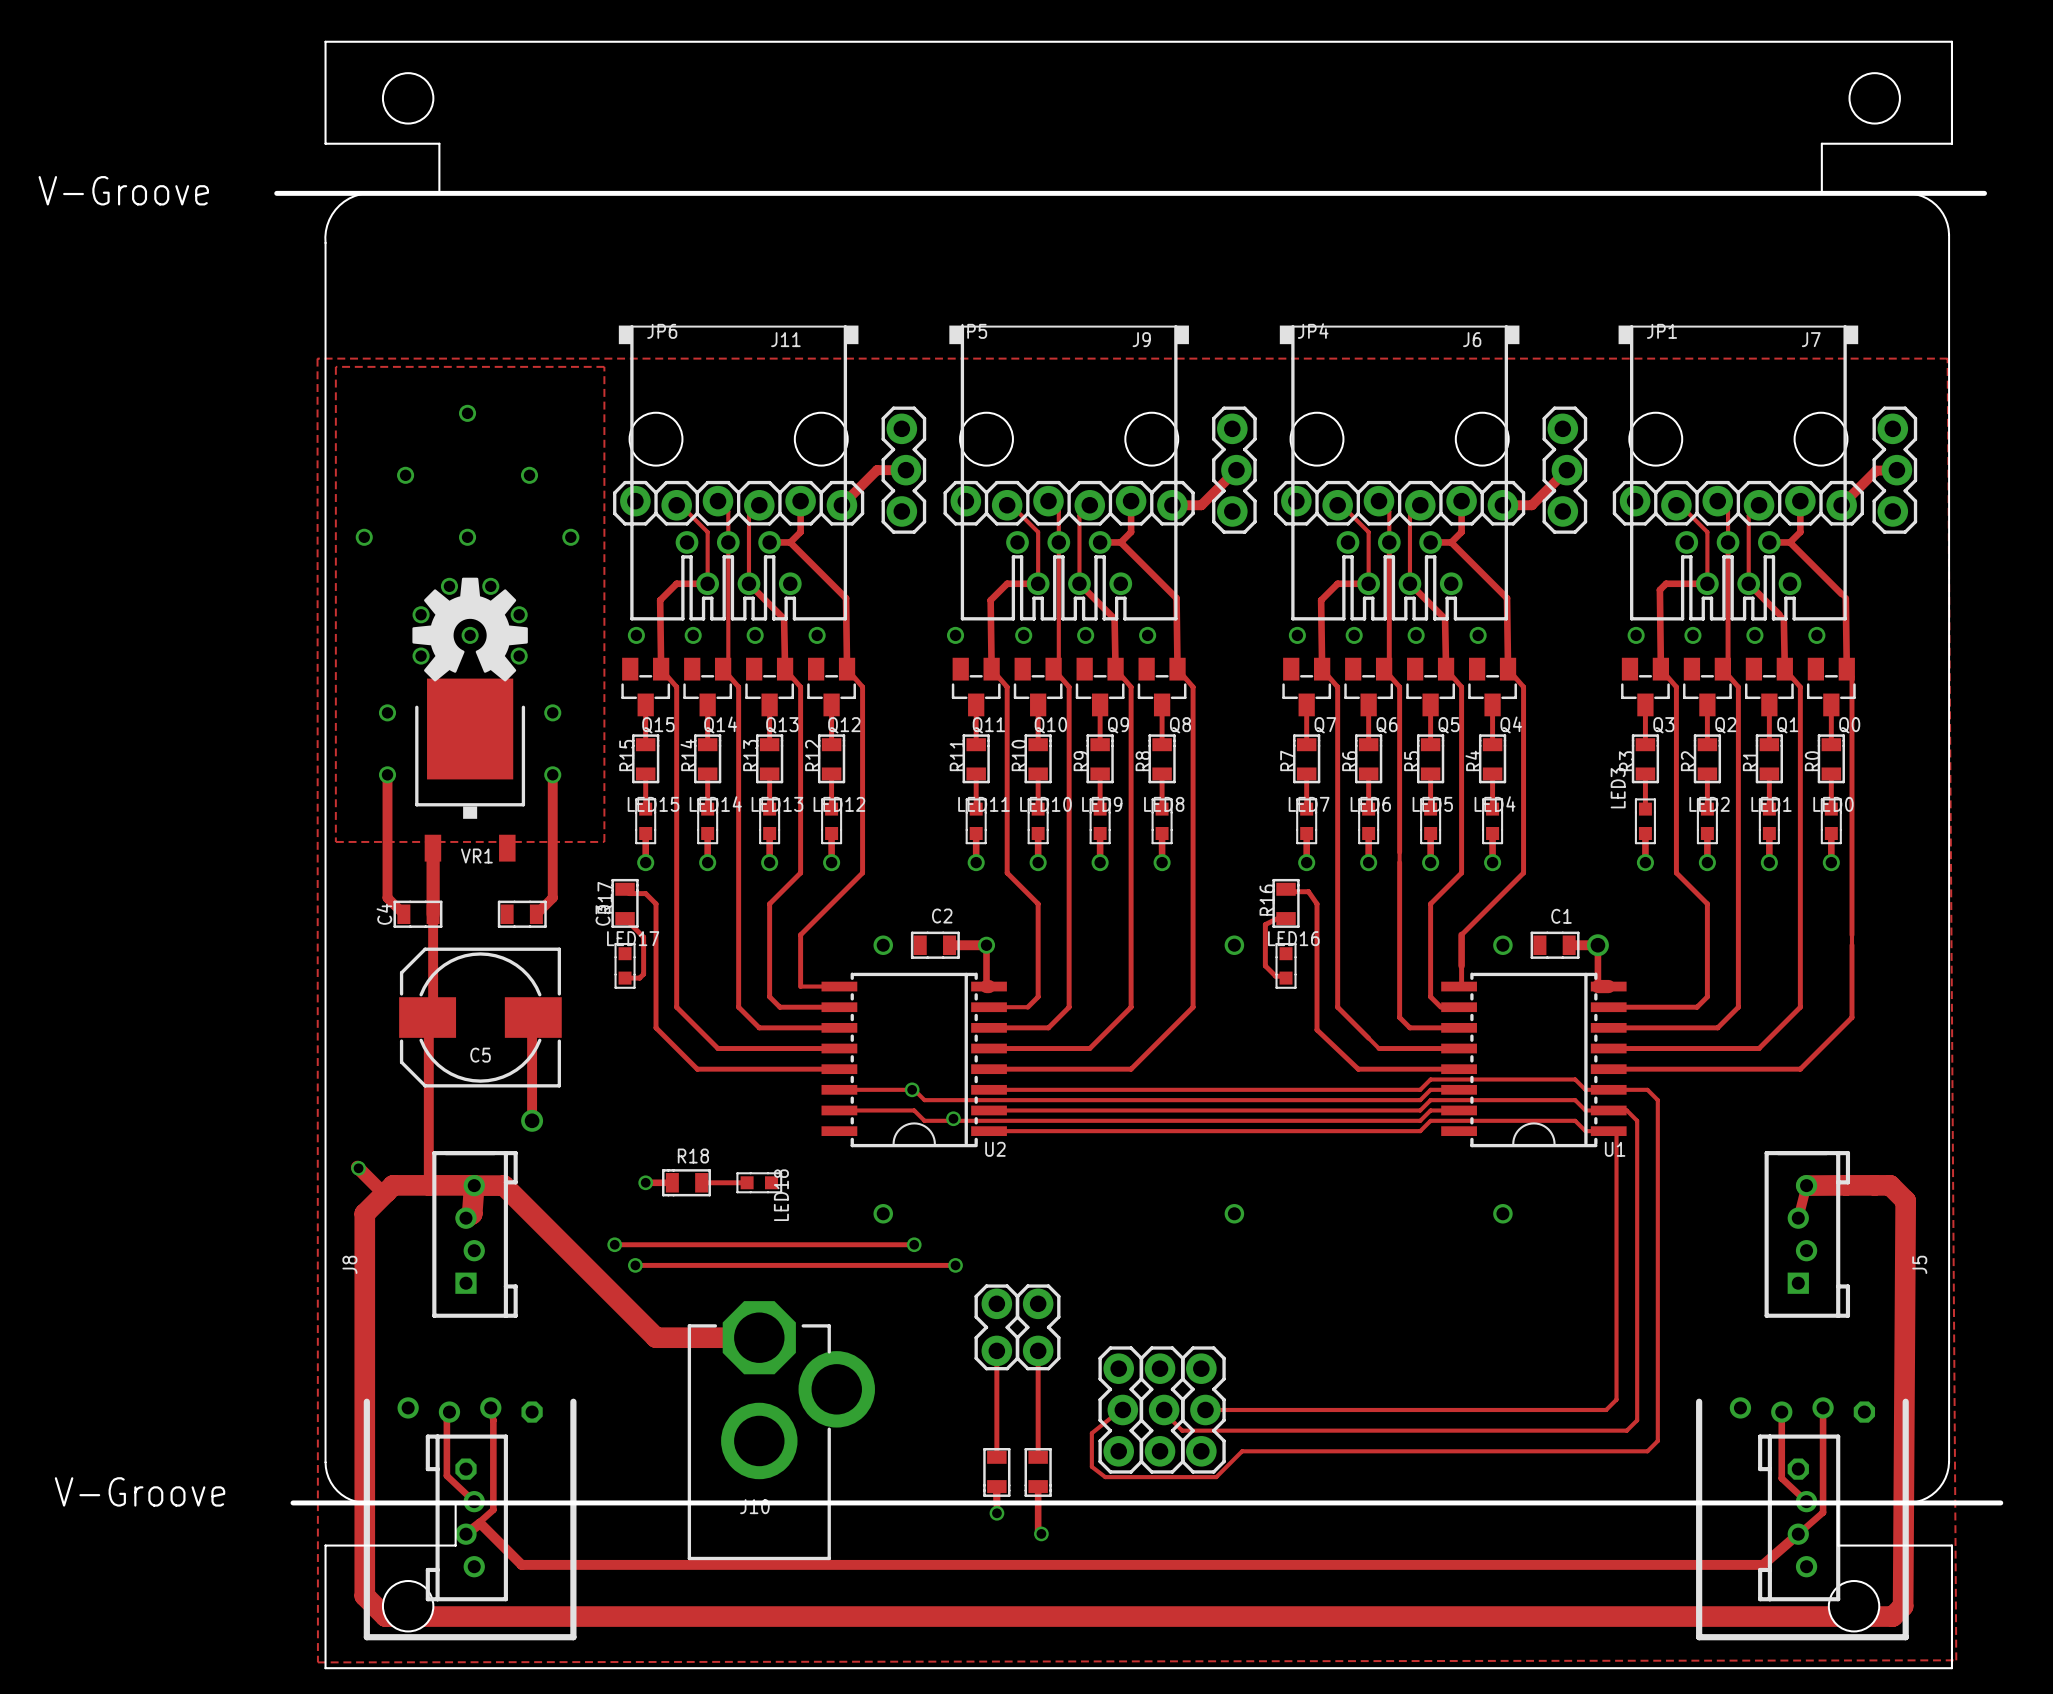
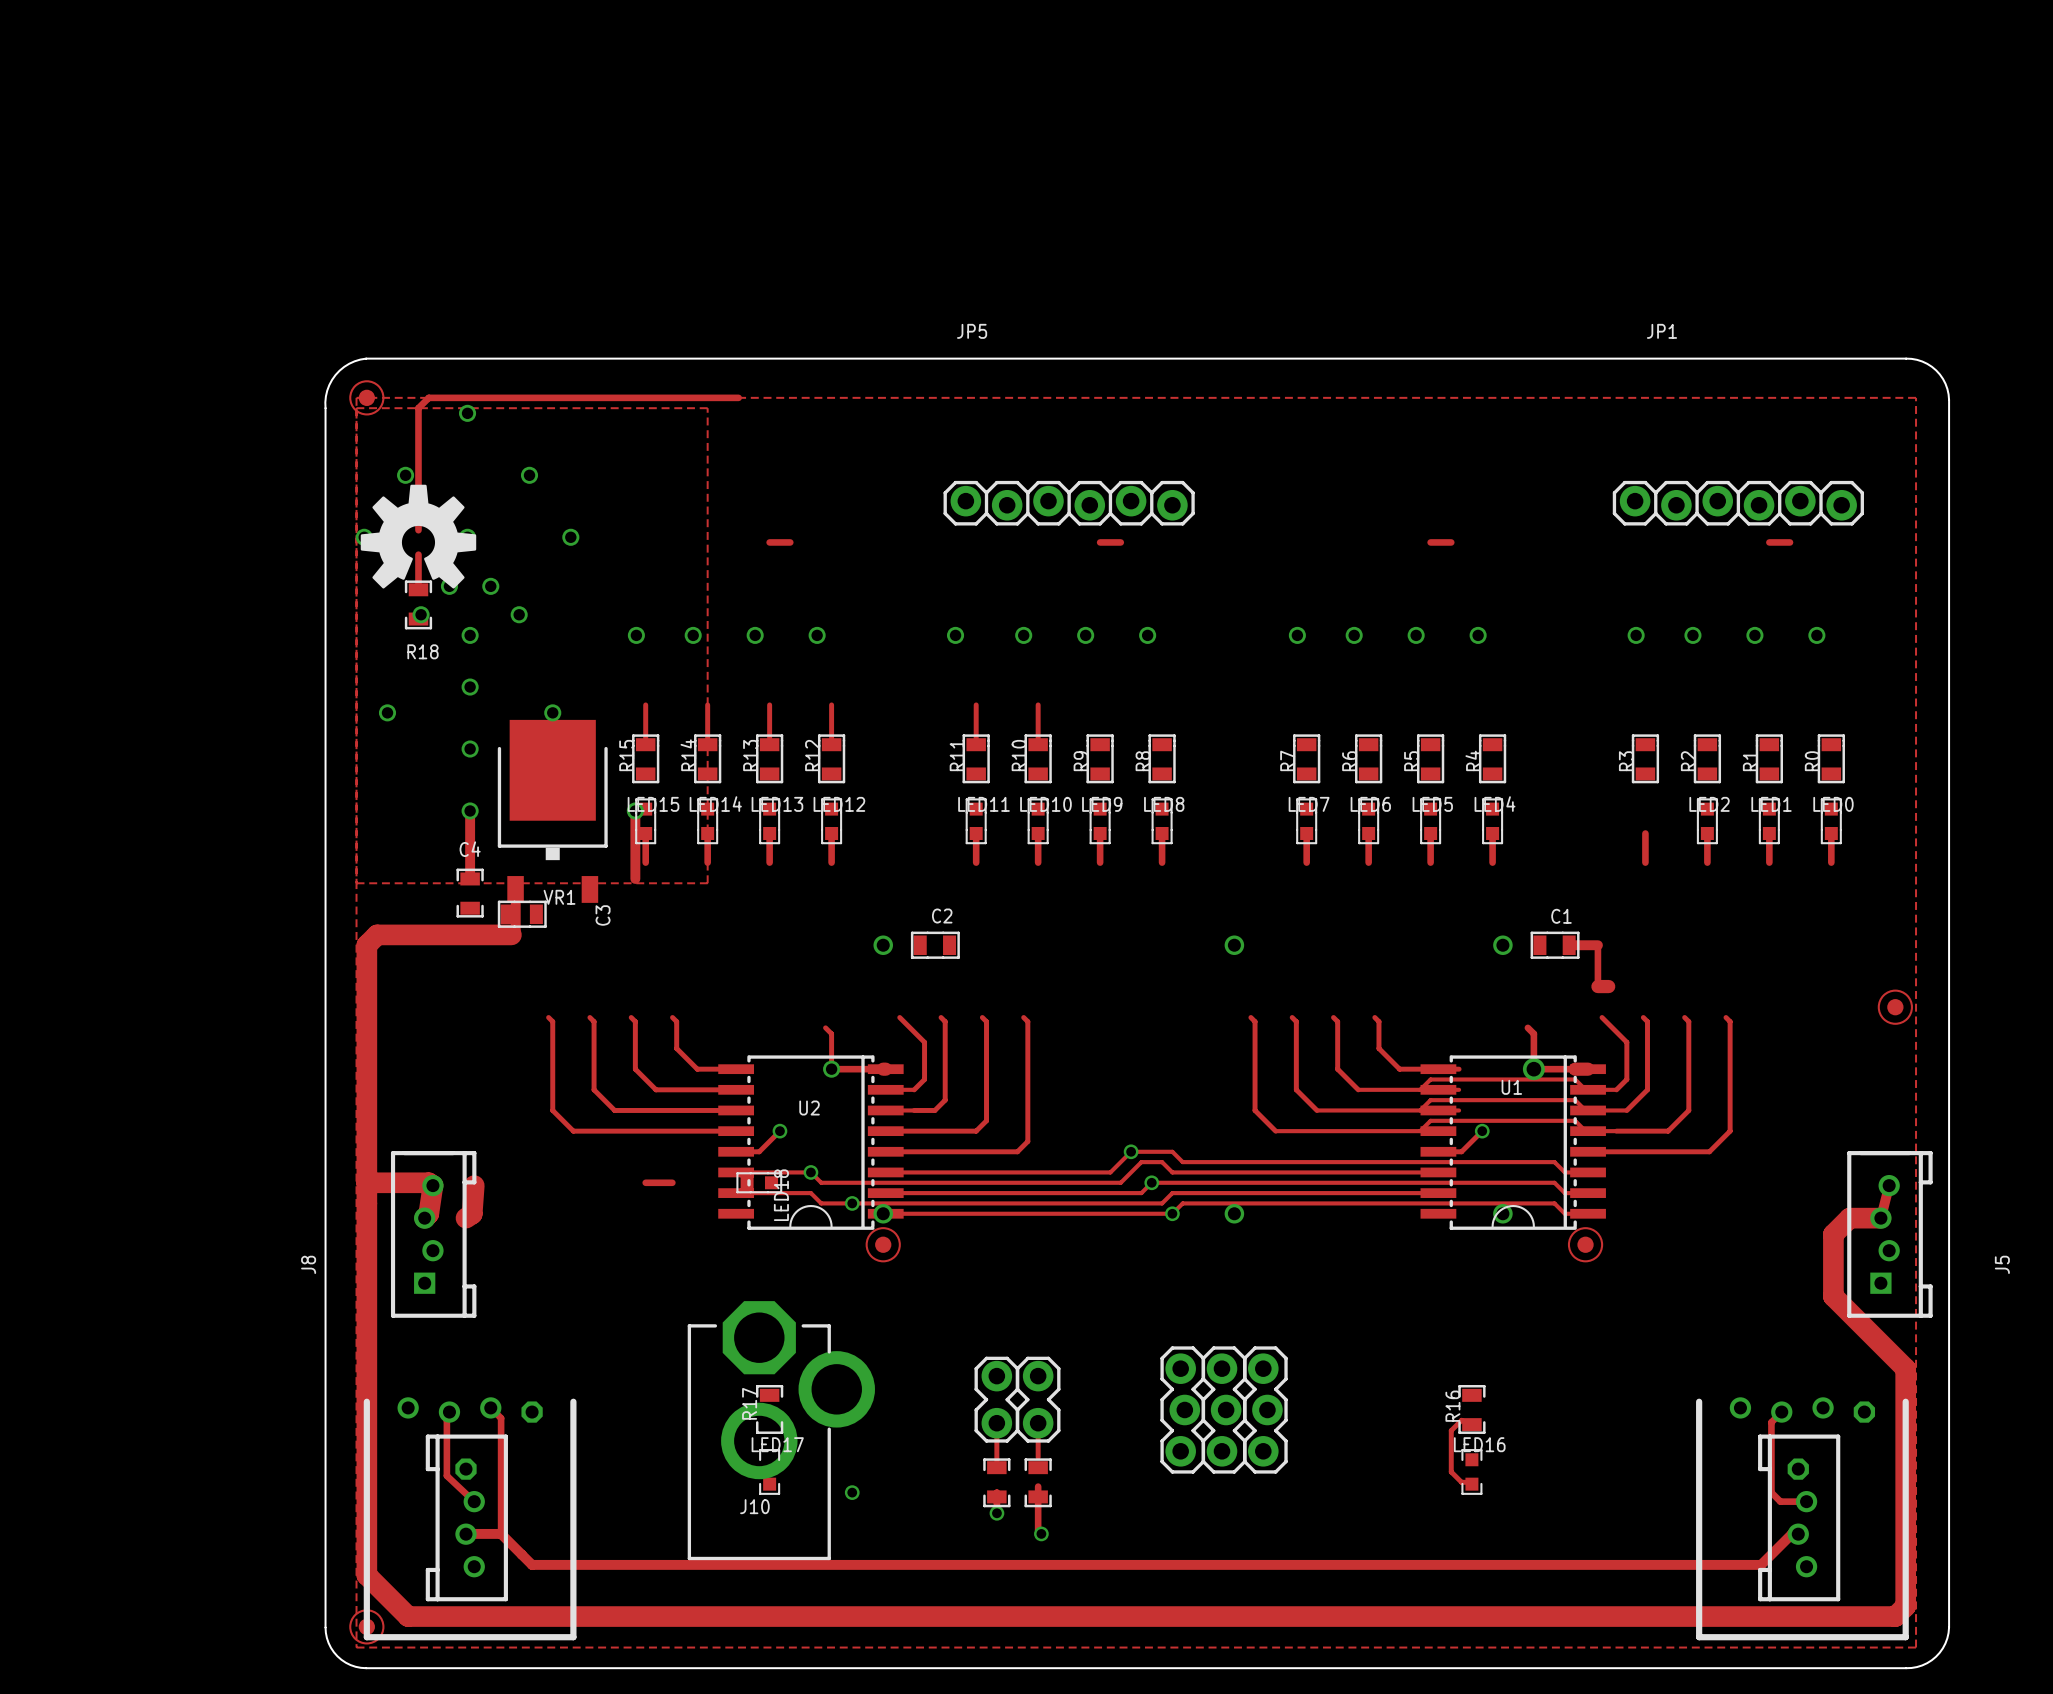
zone outline: (317, 358) (1947, 358) (1956, 1660) (317, 1662) (317, 358) -> (356, 397) (356, 1647) (1916, 1647) (1916, 397) (356, 397)
drawing: none -> [325, 358, 1950, 1669]
zone outline: (335, 366) (604, 366) (604, 841) (335, 841) (335, 366) -> none
part: none -> (366, 397)
track: none -> (738, 397) (428, 397) (418, 408) (418, 530)
zone outline: none -> (356, 408) (707, 408) (707, 883) (356, 883)
part: (903, 470) -> none
track: (905, 470) (877, 470) (841, 505) -> none
part: (1234, 470) -> none
track: (1236, 470) (1201, 505) (1172, 505) -> none
part: (1564, 470) -> none
track: (1566, 470) (1531, 505) (1502, 505) -> none
part: (1894, 470) -> none
track: (1896, 470) (1876, 470) (1841, 505) -> none
J11: (738, 472) -> none
J9: (1069, 472) -> none
J6: (1399, 472) -> none
J7: (1738, 472) -> none
track: (717, 501) (728, 511) (728, 664) (723, 669) (738, 687) (738, 1007) (759, 1027) (839, 1027) -> none
track: (800, 501) (800, 532) (790, 542) (846, 598) (847, 669) (862, 687) (862, 872) (800, 934) (800, 986) (839, 986) -> none
track: (1048, 501) (1058, 511) (1058, 664) (1053, 669) (1069, 687) (1069, 1007) (1048, 1027) (989, 1027) -> none
track: (1131, 501) (1131, 532) (1120, 542) (1176, 598) (1177, 669) (1193, 687) (1193, 1007) (1131, 1069) (989, 1069) -> none
track: (1378, 501) (1389, 511) (1389, 664) (1384, 669) (1399, 687) (1399, 1017) (1409, 1027) (1459, 1027) -> none
track: (1461, 501) (1461, 532) (1451, 542) (1507, 598) (1508, 669) (1523, 687) (1523, 872) (1461, 934) (1461, 986) (1459, 986) -> none
track: (1717, 501) (1728, 511) (1728, 664) (1722, 669) (1738, 687) (1738, 1007) (1717, 1027) (1608, 1027) -> none
track: (1800, 501) (1800, 532) (1790, 542) (1845, 598) (1846, 669) (1851, 676) (1851, 1017) (1800, 1069) (1608, 1069) -> none
JP6: (738, 503) -> none
JP4: (1399, 503) -> none
track: (676, 505) (680, 505) (707, 532) (707, 583) (676, 583) (660, 600) (661, 669) (676, 687) (676, 1007) (717, 1048) (839, 1048) -> none
track: (759, 505) (748, 515) (748, 583) (784, 618) (785, 669) (800, 687) (800, 872) (769, 903) (769, 996) (779, 1007) (839, 1007) -> none
track: (1007, 505) (1013, 511) (1017, 511) (1038, 532) (1038, 583) (1007, 583) (990, 600) (991, 669) (1007, 687) (1007, 872) (1038, 903) (1038, 996) (1027, 1007) (989, 1007) -> none
track: (1089, 505) (1079, 515) (1079, 583) (1114, 618) (1115, 669) (1131, 687) (1131, 1007) (1089, 1048) (989, 1048) -> none
track: (1337, 505) (1341, 505) (1368, 532) (1368, 583) (1337, 583) (1321, 600) (1322, 669) (1337, 687) (1337, 1007) (1378, 1048) (1459, 1048) -> none
track: (1420, 505) (1409, 515) (1409, 583) (1445, 618) (1446, 669) (1461, 687) (1461, 872) (1430, 903) (1430, 996) (1440, 1007) (1459, 1007) -> none
track: (1676, 505) (1677, 503) (1686, 511) (1707, 532) (1707, 583) (1666, 583) (1659, 589) (1660, 669) (1676, 687) (1676, 872) (1707, 903) (1707, 996) (1697, 1007) (1608, 1007) -> none
track: (1759, 505) (1748, 515) (1748, 583) (1783, 618) (1784, 669) (1800, 687) (1800, 1007) (1759, 1048) (1608, 1048) -> none
drawing position: (470, 629) -> (418, 536)
via: (421, 656) -> none
via: (519, 656) -> none
via: none -> (470, 687)
Q15: (645, 687) -> none
Q14: (707, 687) -> none
Q13: (769, 687) -> none
Q12: (831, 687) -> none
Q11: (976, 687) -> none
Q10: (1038, 687) -> none
Q9: (1100, 687) -> none
Q8: (1162, 687) -> none
Q7: (1306, 687) -> none
Q6: (1368, 687) -> none
Q5: (1430, 687) -> none
Q4: (1492, 687) -> none
Q3: (1645, 687) -> none
Q2: (1707, 687) -> none
Q1: (1769, 687) -> none
Q0: (1831, 687) -> none
track: (1100, 704) (1100, 744) -> none
track: (1162, 704) (1162, 744) -> none
track: (1306, 704) (1306, 744) -> none
track: (1368, 704) (1368, 744) -> none
track: (1430, 704) (1430, 744) -> none
track: (1492, 704) (1492, 744) -> none
track: (1645, 704) (1645, 744) -> none
track: (1707, 704) (1707, 744) -> none
track: (1769, 704) (1769, 744) -> none
track: (1831, 704) (1831, 744) -> none
via: none -> (470, 749)
VR1 position: (470, 770) -> (552, 811)
track: (645, 773) (645, 809) -> (418, 554) (418, 589)
track: (707, 773) (707, 809) -> none
track: (769, 773) (769, 809) -> none
track: (831, 773) (831, 809) -> none
track: (976, 773) (976, 809) -> none
track: (1038, 773) (1038, 809) -> none
track: (1100, 773) (1100, 809) -> none
track: (1162, 773) (1162, 809) -> none
track: (1306, 773) (1306, 809) -> none
track: (1368, 773) (1368, 809) -> none
track: (1430, 773) (1430, 809) -> none
track: (1492, 773) (1492, 809) -> none
track: (1645, 773) (1645, 809) -> none
track: (1707, 773) (1707, 809) -> none
track: (1769, 773) (1769, 809) -> none
track: (1831, 773) (1831, 809) -> none
track: (387, 774) (387, 897) (403, 914) -> none
via: (387, 774) -> none
track: (552, 774) (552, 897) (536, 914) -> none
via: (552, 774) -> none
track: none -> (470, 810) (470, 878)
via: none -> (470, 810)
track: none -> (635, 810) (635, 878)
via: none -> (635, 810)
LED3: (1645, 821) -> none
track: (433, 848) (433, 1012) (427, 1017) (428, 1185) -> none
part: (1138, 854) -> none
via: (645, 862) -> none
via: (707, 862) -> none
via: (769, 862) -> none
via: (831, 862) -> none
via: (976, 862) -> none
via: (1038, 862) -> none
via: (1100, 862) -> none
via: (1162, 862) -> none
via: (1306, 862) -> none
via: (1368, 862) -> none
via: (1430, 862) -> none
via: (1492, 862) -> none
via: (1645, 862) -> none
via: (1707, 862) -> none
via: (1769, 862) -> none
via: (1831, 862) -> none
R17 footprint: [611, 878, 639, 928] -> [756, 1385, 784, 1434]
R16 footprint: [1272, 878, 1300, 928] -> [1458, 1385, 1486, 1434]
track: (625, 889) (629, 893) (645, 893) (656, 903) (656, 1027) (676, 1048) -> (672, 1017) (676, 1021) (676, 1048)
track: (1286, 889) (1288, 891) (1308, 891) (1317, 903) (1317, 1029) (1358, 1069) (1399, 1069) -> (1374, 1017) (1378, 1021) (1378, 1048) (1399, 1069)
C4 footprint: [393, 900, 443, 928] -> [456, 868, 484, 918]
C4 name position: C4 (384, 914) -> C4 (470, 849)
track: (625, 918) (643, 937) (643, 974) (639, 978) (625, 978) -> none
track: (1286, 918) (1279, 917) (1265, 924) (1265, 965) (1275, 976) (1287, 976) (1286, 978) -> none
LED17 footprint: [614, 942, 636, 989] -> [759, 1449, 781, 1495]
LED16 footprint: [1275, 942, 1297, 989] -> [1461, 1449, 1483, 1495]
track: (949, 945) (986, 945) (986, 986) (989, 986) -> none
via: (986, 945) -> none
via: (1597, 945) -> none
part: none -> (1895, 1007)
C5: (480, 1017) -> none
track: (533, 1017) (542, 1017) (532, 1027) (532, 1120) -> none
track: none -> (548, 1017) (552, 1021) (552, 1110) (573, 1131) (736, 1131)
track: none -> (589, 1017) (594, 1021) (594, 1089) (614, 1110) (736, 1110)
track: none -> (631, 1017) (635, 1021) (635, 1069) (656, 1089) (736, 1089)
track: none -> (982, 1017) (986, 1021) (986, 1120) (976, 1131) (885, 1131)
track: none -> (1023, 1017) (1027, 1021) (1027, 1141) (1017, 1151) (885, 1151)
track: none -> (1725, 1017) (1730, 1021) (1730, 1131) (1709, 1151) (1588, 1151)
track: none -> (1527, 1027) (1533, 1033) (1533, 1069) (1588, 1069)
U2 position: (914, 1059) -> (810, 1142)
U1 position: (1533, 1059) -> (1513, 1142)
track: (736, 1069) (831, 1069) -> (825, 1027) (831, 1033) (831, 1069)
via: none -> (831, 1069)
track: none -> (839, 1069) (885, 1069)
via: none -> (1533, 1069)
track: (839, 1089) (885, 1089) -> none
via: (912, 1089) -> none
track: (914, 1089) (924, 1100) (1420, 1100) (1430, 1089) -> (914, 1089) (924, 1079) (924, 1042) (899, 1017)
track: (989, 1089) (1358, 1089) -> (1333, 1017) (1337, 1021) (1337, 1069) (1358, 1089)
track: (1616, 1089) (1647, 1089) (1657, 1100) (1657, 1440) (1647, 1451) (1242, 1451) (1216, 1477) (1105, 1477) (1091, 1466) (1091, 1433) (1122, 1409) -> (1616, 1089) (1626, 1079) (1626, 1042) (1602, 1017)
track: (839, 1110) (885, 1110) -> none
track: (914, 1110) (924, 1120) (1420, 1120) (1430, 1110) -> (914, 1110) (934, 1110) (945, 1100) (945, 1021) (941, 1017)
track: (989, 1110) (1317, 1110) -> (1292, 1017) (1296, 1021) (1296, 1089) (1317, 1110)
track: (1626, 1110) (1637, 1120) (1637, 1420) (1626, 1430) (1182, 1430) (1162, 1409) (1164, 1409) -> (1626, 1110) (1647, 1089) (1647, 1021) (1643, 1017)
via: (953, 1118) -> none
via: (532, 1120) -> none
track: none -> (779, 1131) (759, 1151) (736, 1151)
via: none -> (779, 1131)
track: (989, 1131) (1275, 1131) -> (1250, 1017) (1255, 1021) (1255, 1110) (1275, 1131)
track: none -> (1482, 1131) (1461, 1151) (1438, 1151)
via: none -> (1482, 1131)
track: (1616, 1131) (1616, 1399) (1606, 1409) (1205, 1409) -> (1616, 1131) (1668, 1131) (1688, 1110) (1688, 1021) (1684, 1017)
U2 name position: U2 (995, 1149) -> U2 (809, 1108)
U1 name position: U1 (1615, 1149) -> U1 (1511, 1087)
via: none -> (1131, 1151)
R18 name position: R18 (693, 1156) -> R18 (422, 651)
track: (357, 1167) (382, 1192) (386, 1192) -> none
via: (358, 1168) -> none
R18 footprint: [662, 1169, 711, 1197] -> [404, 580, 433, 630]
track: none -> (736, 1172) (810, 1172) (821, 1182) (1120, 1182) (1141, 1162) (1162, 1162) (1172, 1172) (1438, 1172)
via: none -> (810, 1172)
track: none -> (885, 1172) (1110, 1172) (1131, 1151) (1172, 1151) (1182, 1162) (1554, 1162) (1564, 1172) (1588, 1172)
track: none -> (366, 1182) (428, 1182) (432, 1185) (428, 1213) (424, 1218)
via: (645, 1182) -> none
track: (701, 1182) (747, 1182) -> none
via: none -> (1151, 1182)
track: none -> (736, 1193) (810, 1193) (821, 1203) (1162, 1203) (1172, 1193) (1438, 1193)
track: none -> (885, 1193) (1141, 1193) (1151, 1182) (1554, 1182) (1564, 1193) (1588, 1193)
via: none -> (852, 1203)
track: none -> (885, 1213) (1172, 1213) (1182, 1203) (1554, 1203) (1564, 1213) (1588, 1213)
via: none -> (1172, 1213)
track: (1798, 1218) (1806, 1185) (1890, 1185) (1905, 1200) (1903, 1606) (1892, 1616) -> (1889, 1185) (1880, 1218) (1849, 1218) (1833, 1234) (1833, 1296) (1905, 1368) (1905, 1606) (1895, 1616) (1892, 1616)
J8 position: (475, 1234) -> (433, 1234)
J5 position: (1807, 1234) -> (1889, 1234)
track: (614, 1244) (914, 1244) -> none
via: (614, 1244) -> none
part: none -> (883, 1244)
via: (914, 1244) -> none
part: none -> (1585, 1244)
track: (635, 1265) (955, 1265) -> none
via: (635, 1265) -> none
via: (955, 1265) -> none
part: (996, 1327) -> none
part: (1038, 1327) -> none
track: (759, 1337) (656, 1337) (503, 1185) (393, 1185) (364, 1213) (364, 1595) (385, 1616) (408, 1616) -> (515, 903) (515, 930) (511, 934) (377, 934) (366, 945) (366, 1575) (408, 1616)
track: (996, 1350) (996, 1423) -> none
track: (1038, 1350) (1038, 1423) -> none
part: none -> (996, 1399)
part: none -> (1038, 1399)
track: (490, 1407) (493, 1420) (493, 1509) (465, 1534) (480, 1523) (521, 1564) (532, 1564) -> (490, 1407) (501, 1418) (501, 1533)
track: (1823, 1407) (1823, 1512) (1761, 1564) -> (1798, 1534) (1791, 1534) (1761, 1564)
part: (1120, 1409) -> none
part: (1162, 1409) -> none
part: none -> (1182, 1409)
part: (1203, 1409) -> none
part: none -> (1224, 1409)
part: none -> (1265, 1409)
track: (1781, 1412) (1781, 1478) (1806, 1501) -> (1781, 1412) (1771, 1422) (1771, 1492) (1780, 1501) (1806, 1501)
track: none -> (1471, 1424) (1461, 1420) (1451, 1430) (1451, 1471) (1461, 1482) (1471, 1482) (1471, 1484)
part footprint: [983, 1448, 1011, 1497] -> [983, 1458, 1011, 1508]
part footprint: [1024, 1448, 1052, 1497] -> [1024, 1458, 1052, 1508]
via: none -> (852, 1492)
track: none -> (501, 1533) (465, 1534)
track: none -> (501, 1533) (532, 1564)
part: none -> (366, 1626)

